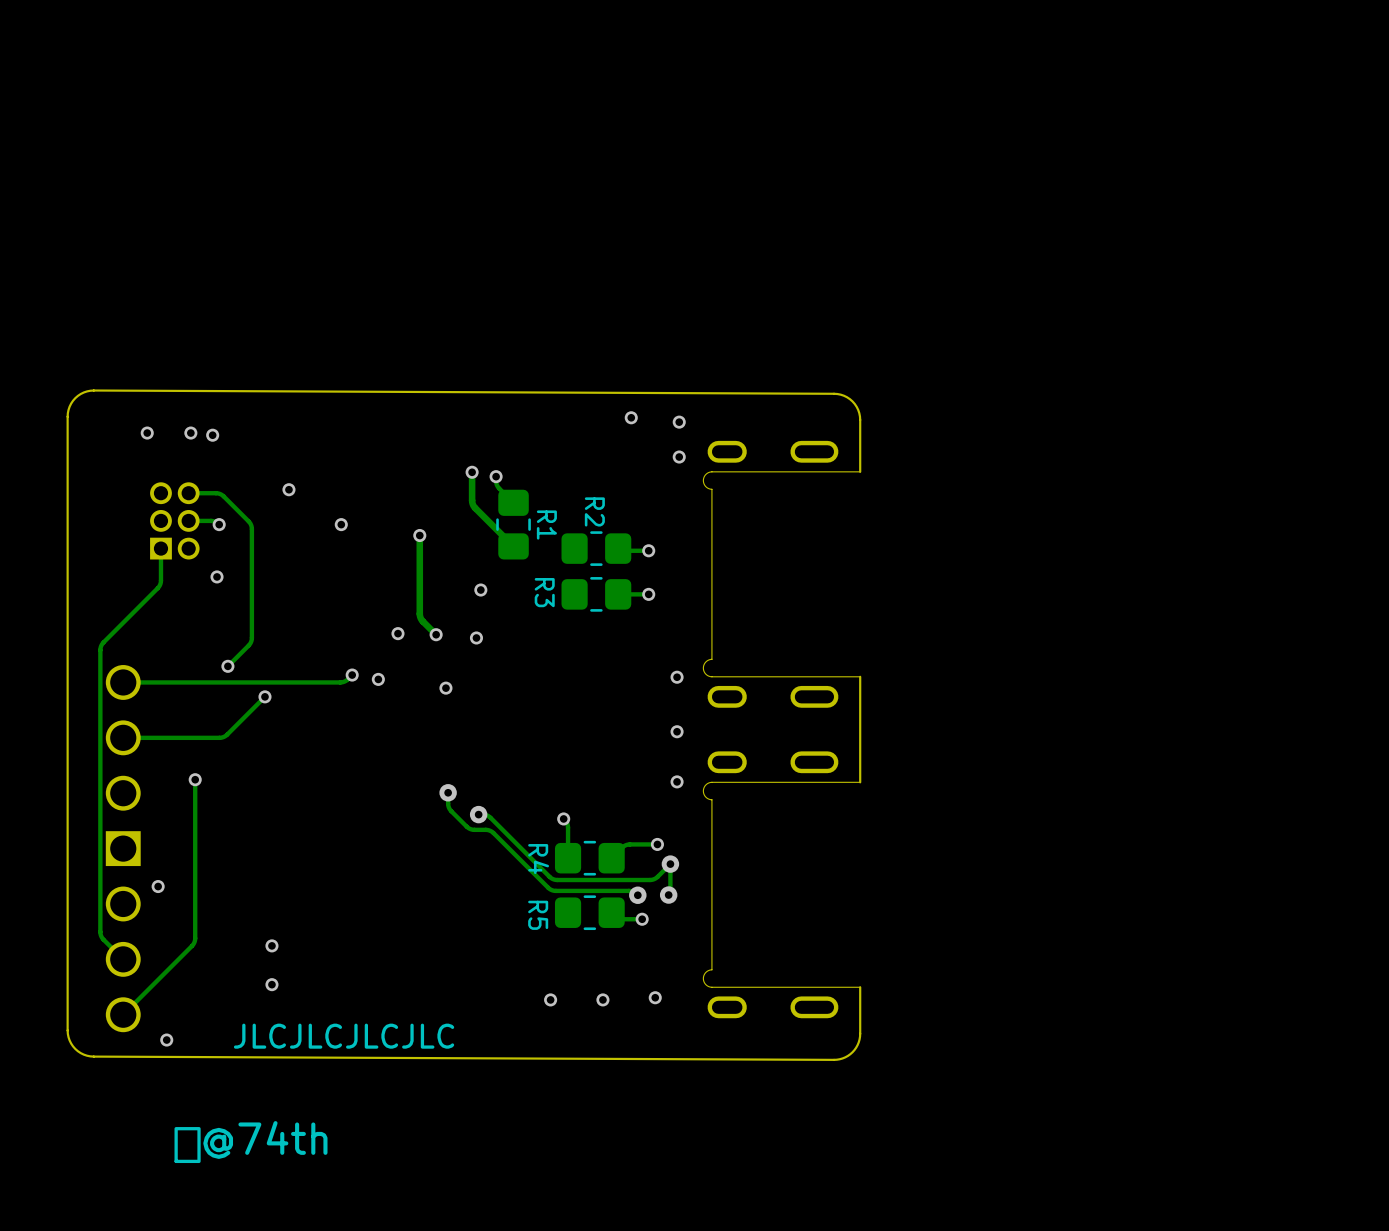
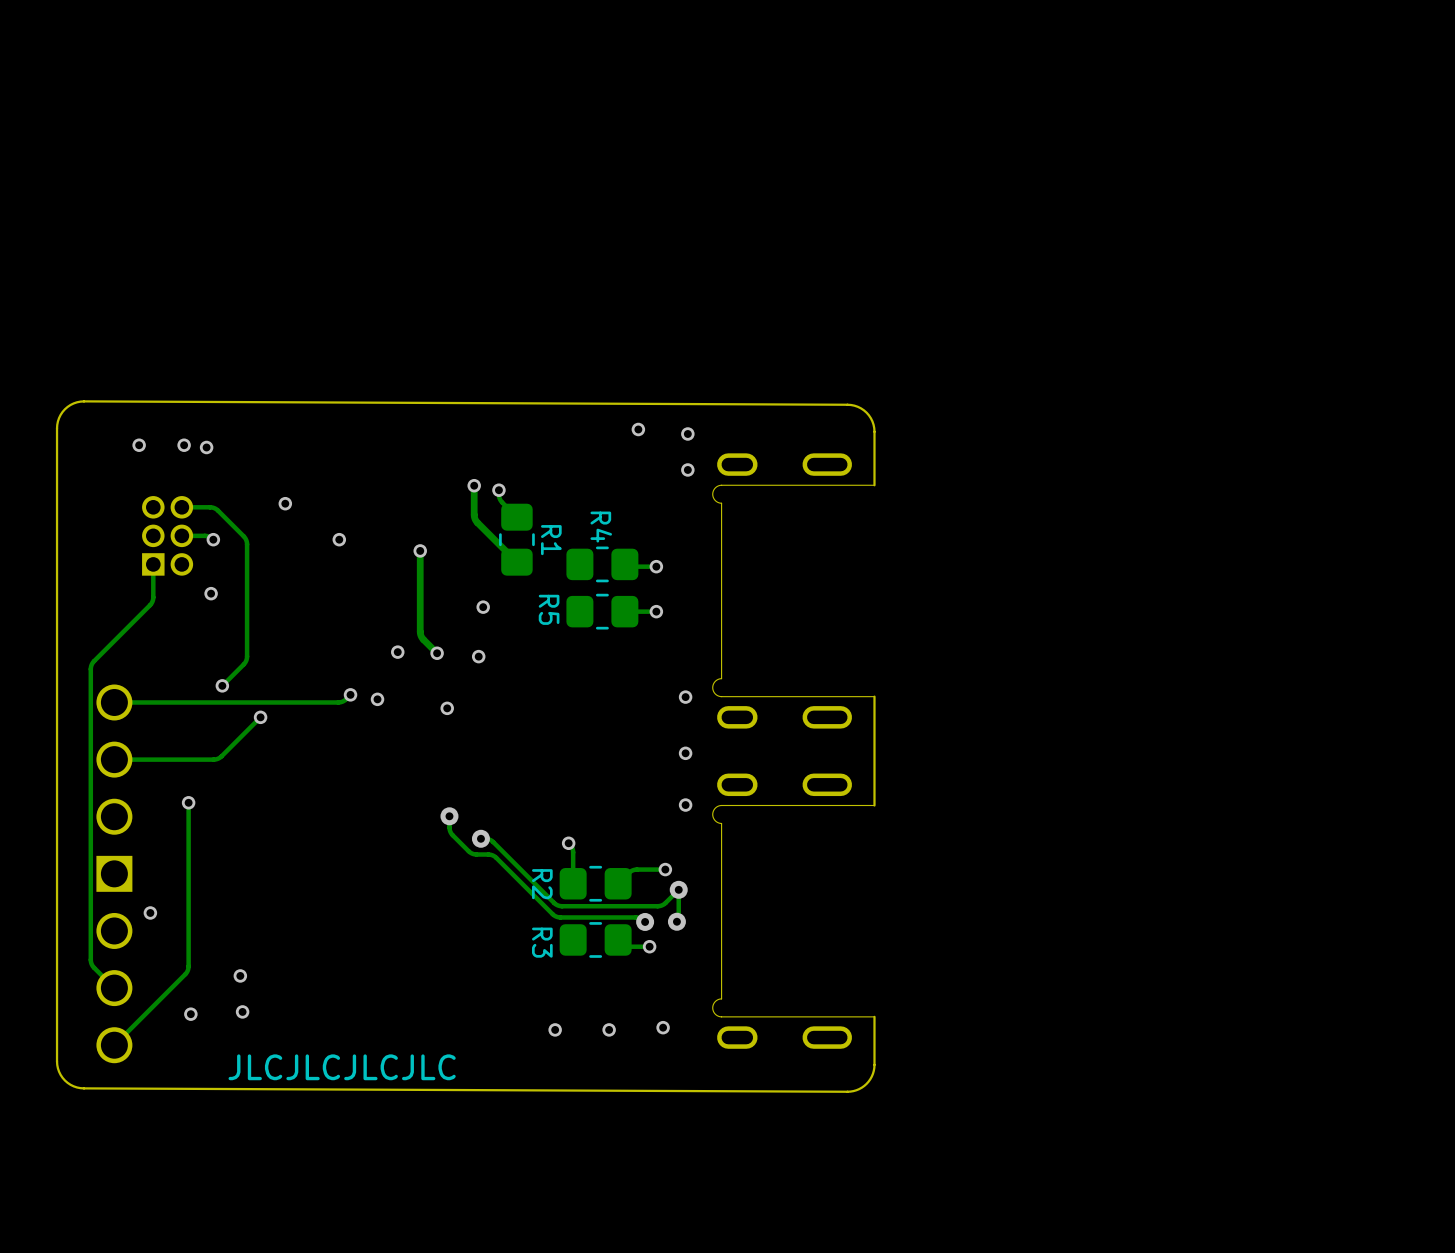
R2 name: R2 (594, 511) -> R4 (601, 527)
R3 name: R3 (544, 592) -> R5 (549, 609)
R4 name: R4 (538, 859) -> R2 (542, 884)
R5 name: R5 (538, 915) -> R3 (542, 942)
via: (271, 945) -> none
via: none -> (240, 975)
via: none -> (242, 1011)
via: none -> (190, 1014)
via: (271, 984) -> none
via: (166, 1040) -> none
drawing: [174, 1121, 328, 1164] -> none

